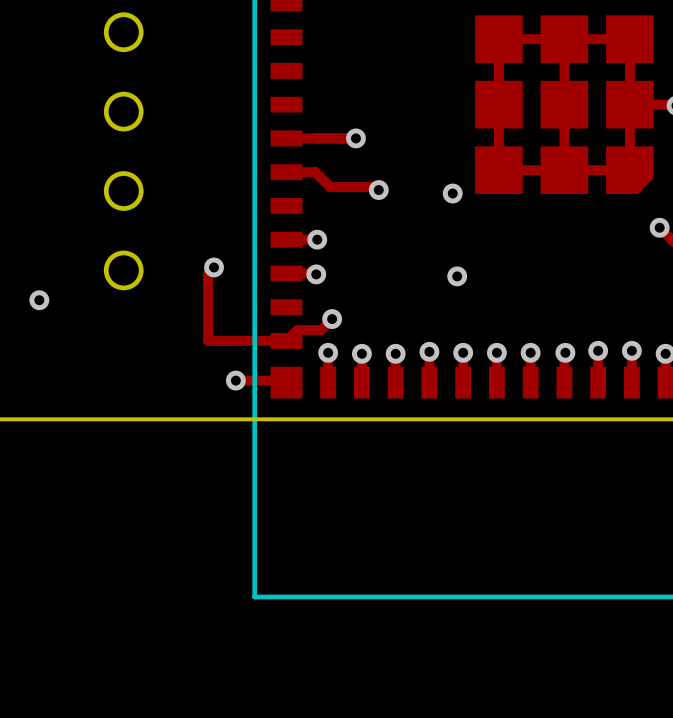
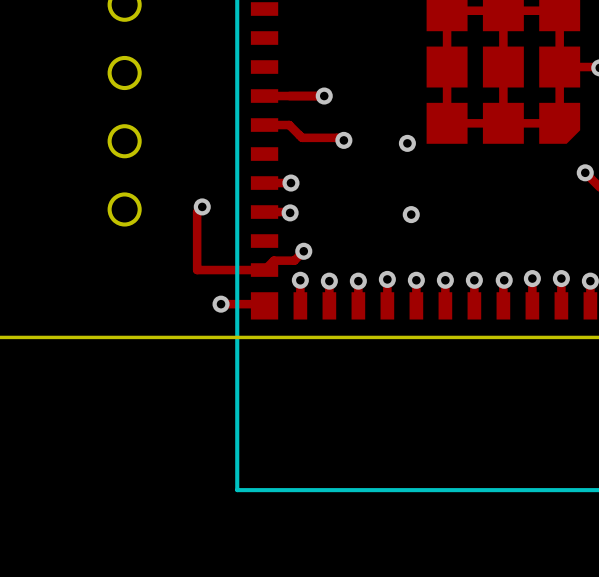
via: (39, 300) -> none

